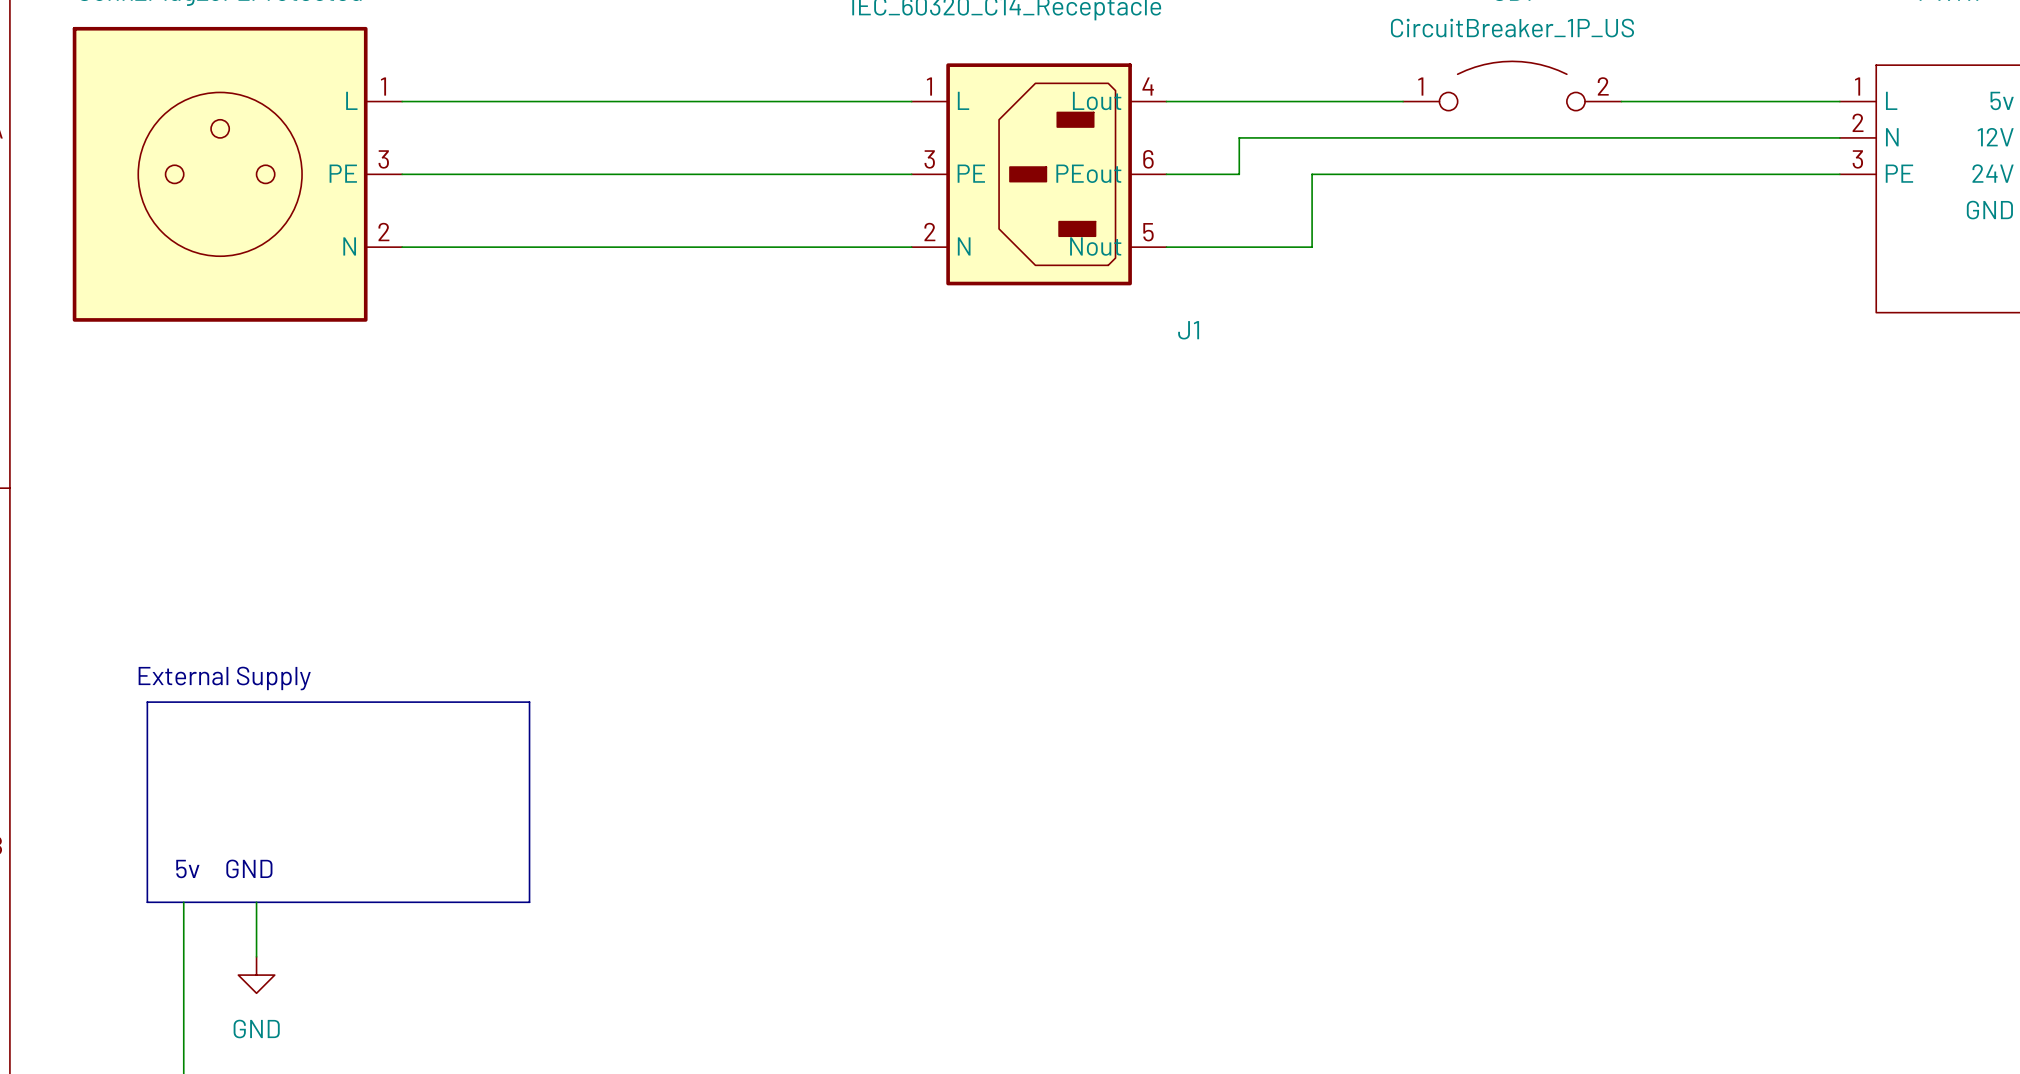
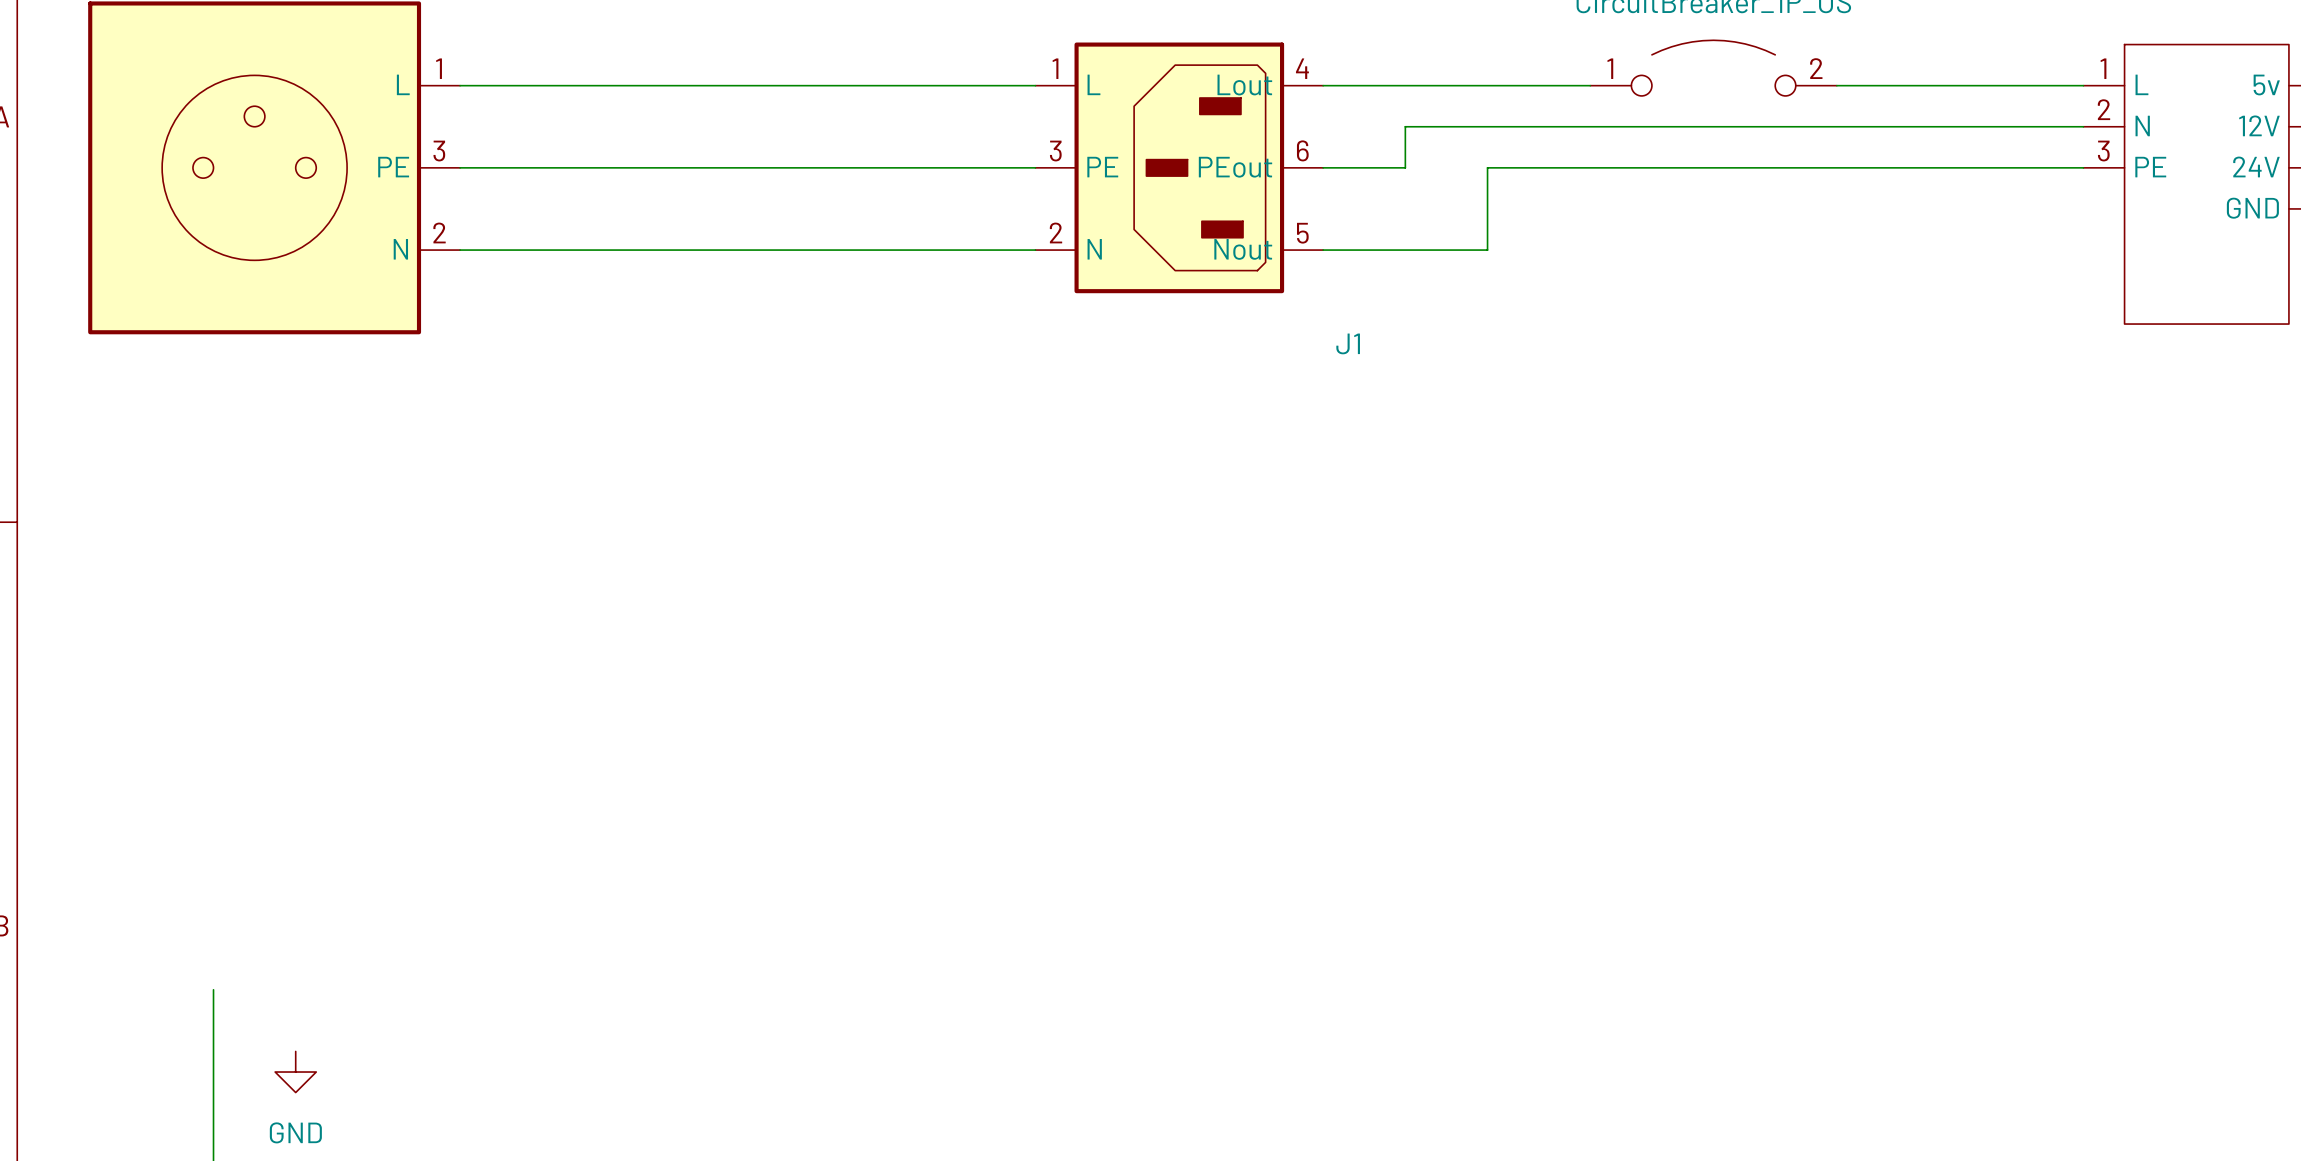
text: External Supply (224, 678) -> none
line: (147, 702) (529, 702) (529, 902) (147, 902) (147, 702) -> none
text: GND (249, 868) -> none
text: 5v (187, 869) -> none
wire: (256, 902) (256, 956) -> none

